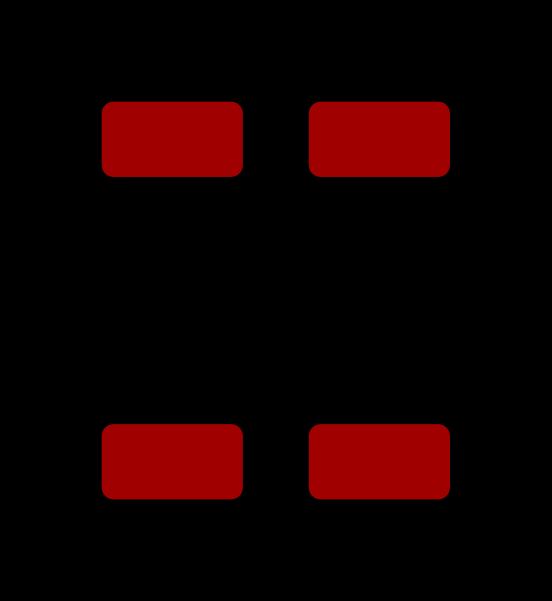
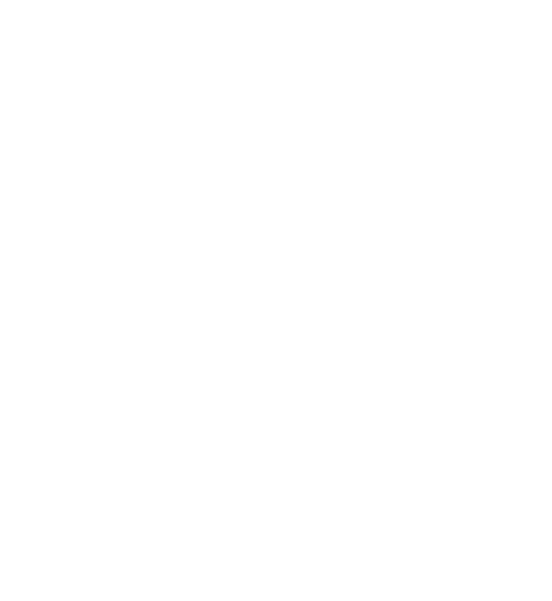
part: (275, 139) -> none
part: (275, 461) -> none

